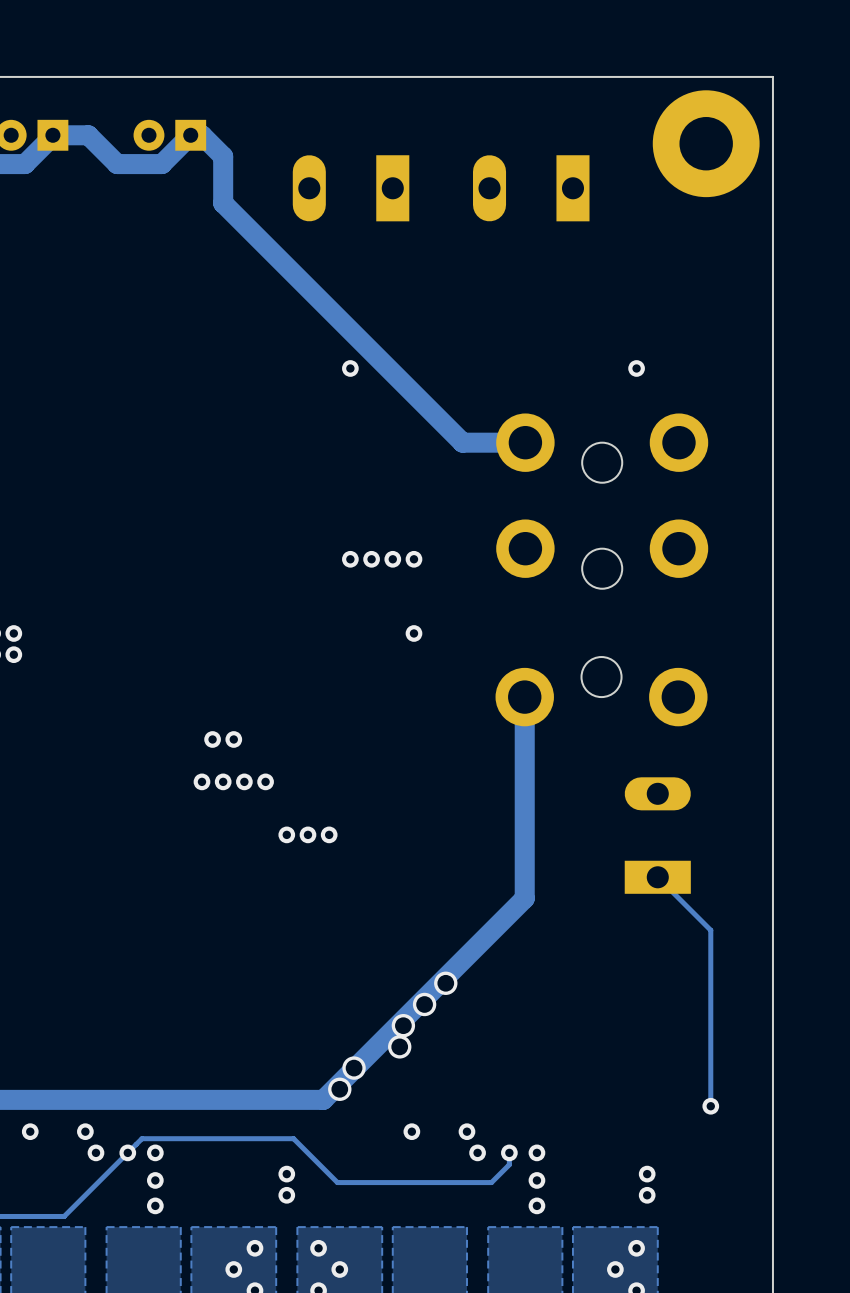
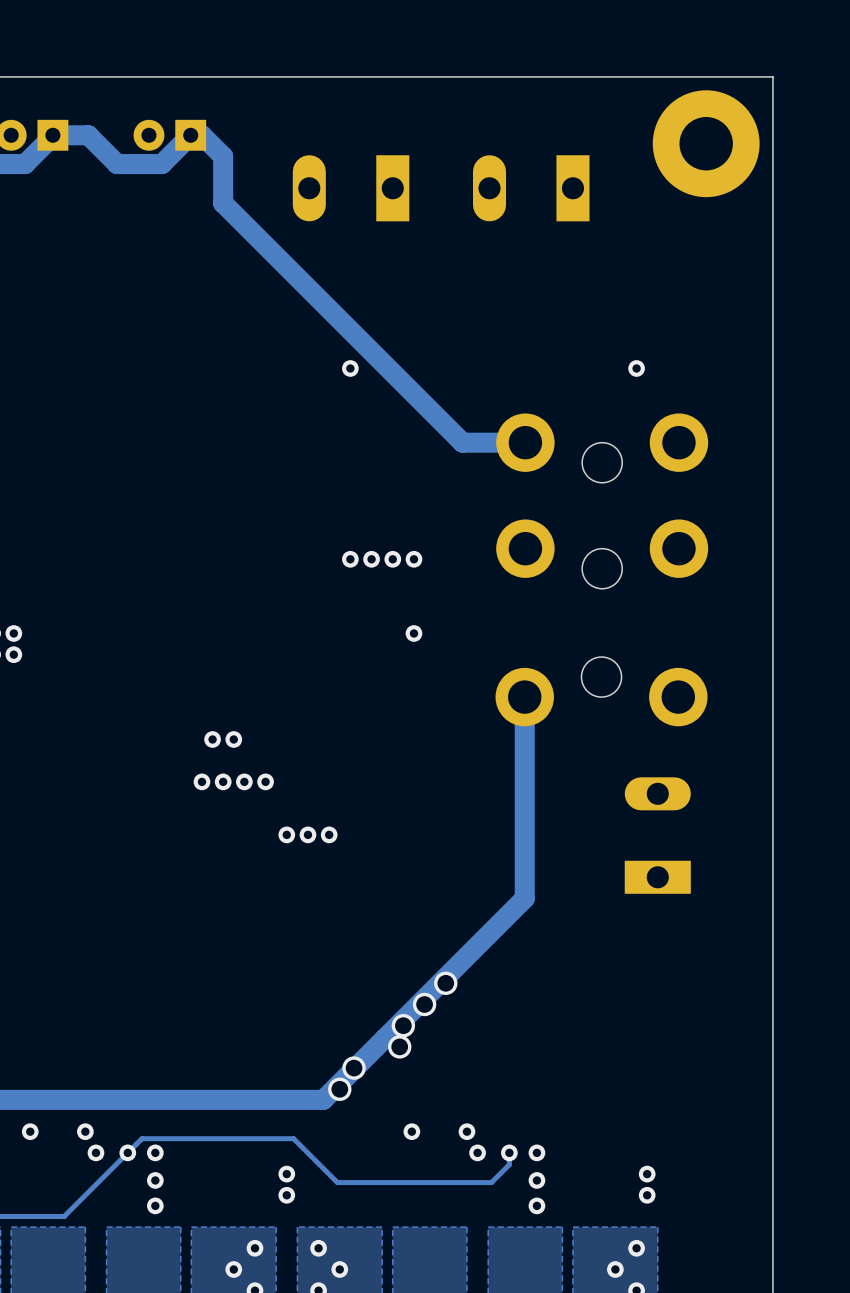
track: (657, 877) (710, 930) (710, 1106) -> none
via: (710, 1106) -> none

